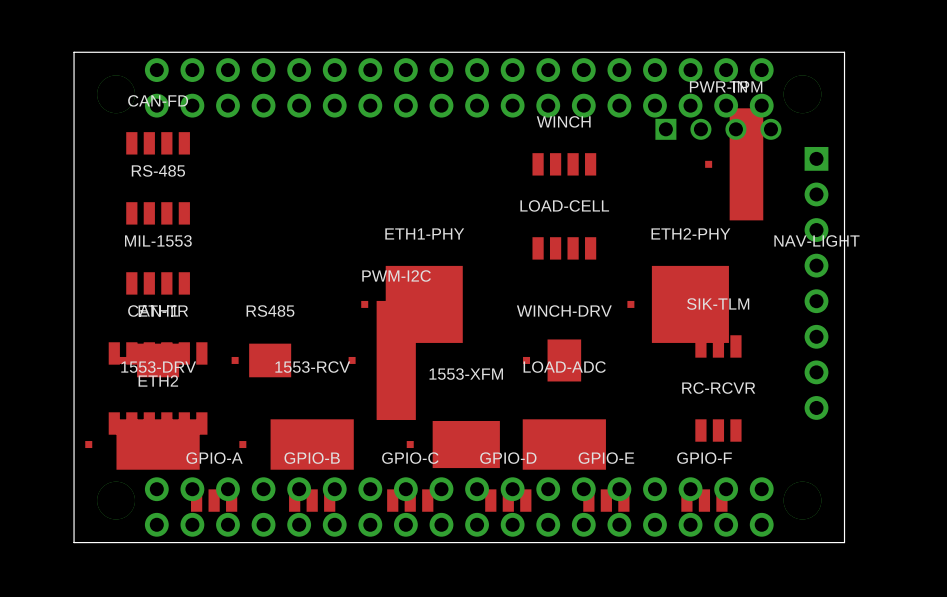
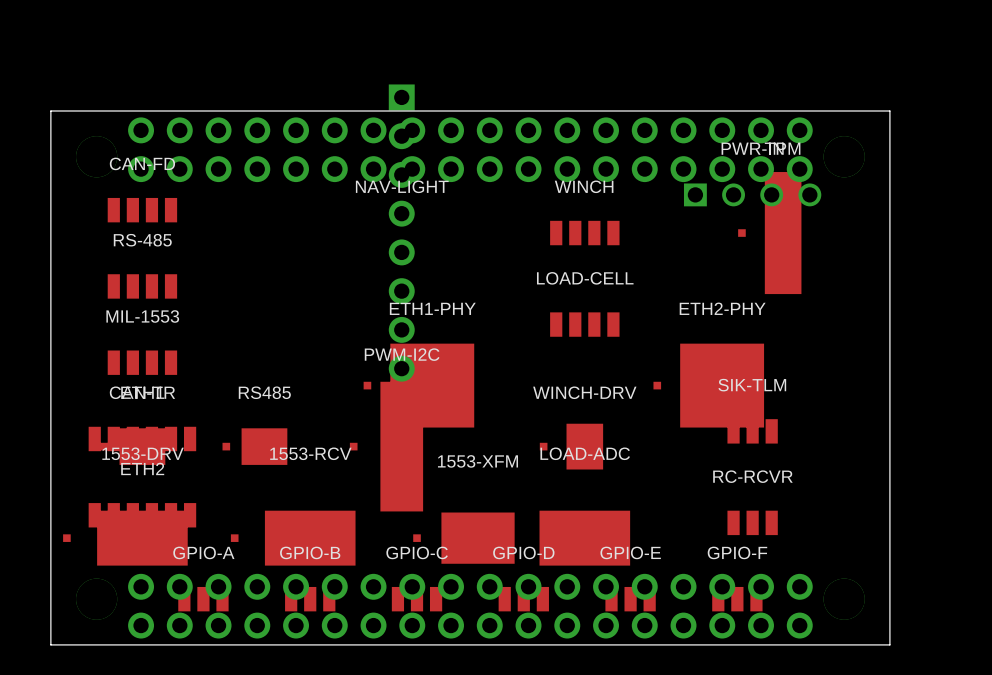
NAV-LIGHT: none -> (401, 233)
NAV-LIGHT: (816, 283) -> none

